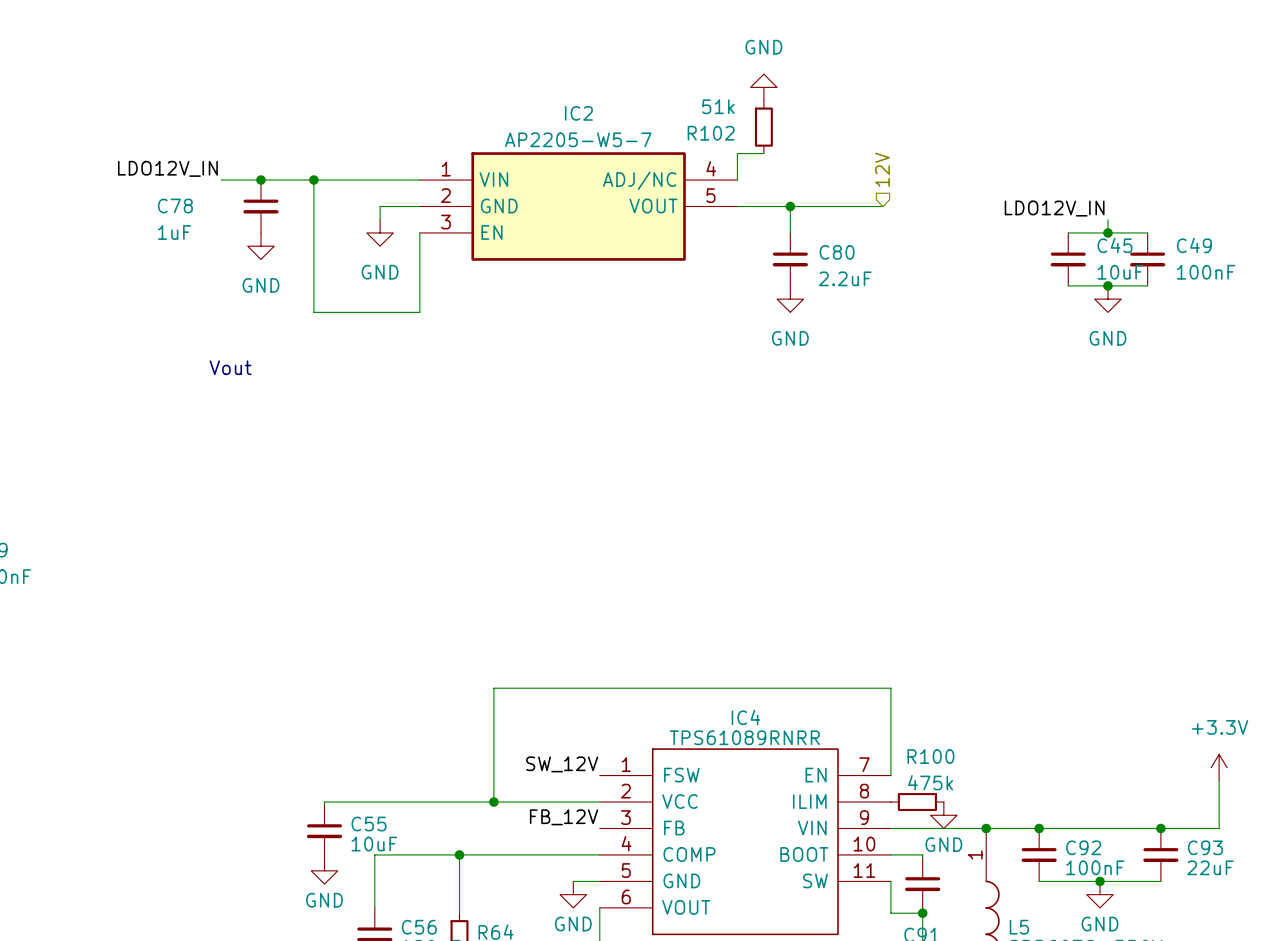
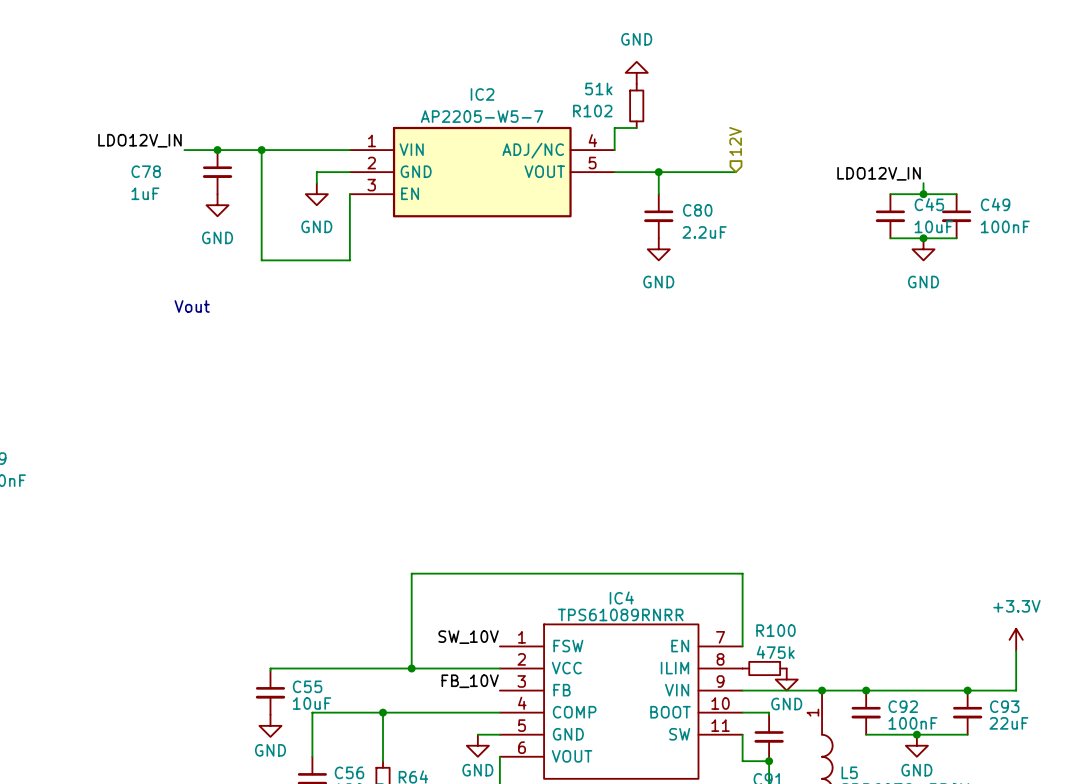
label: SW_12V (562, 764) -> SW_10V (468, 637)
label: FB_12V (564, 817) -> FB_10V (470, 681)

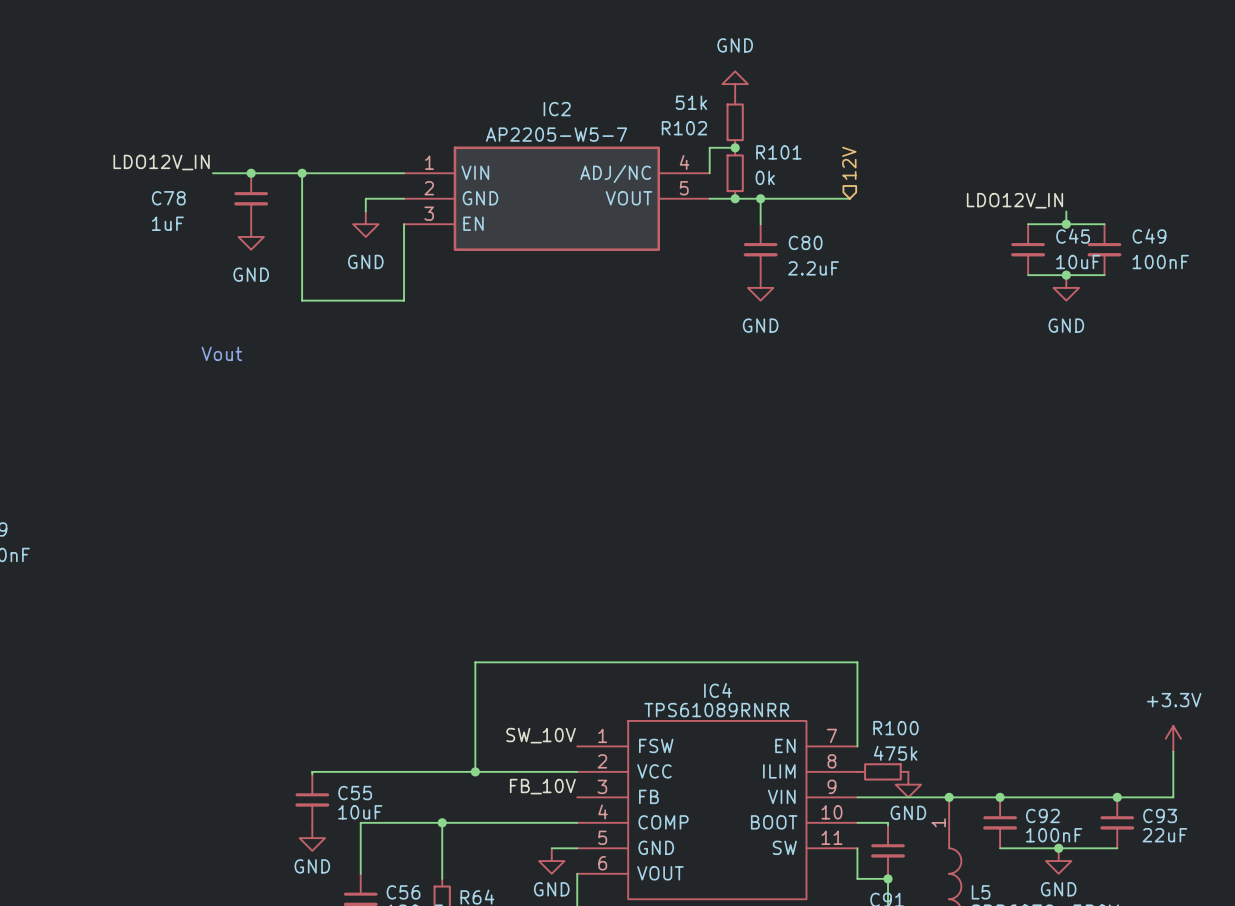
junction: none -> (735, 147)
R101: none -> 0k (735, 173)
junction: none -> (735, 198)

